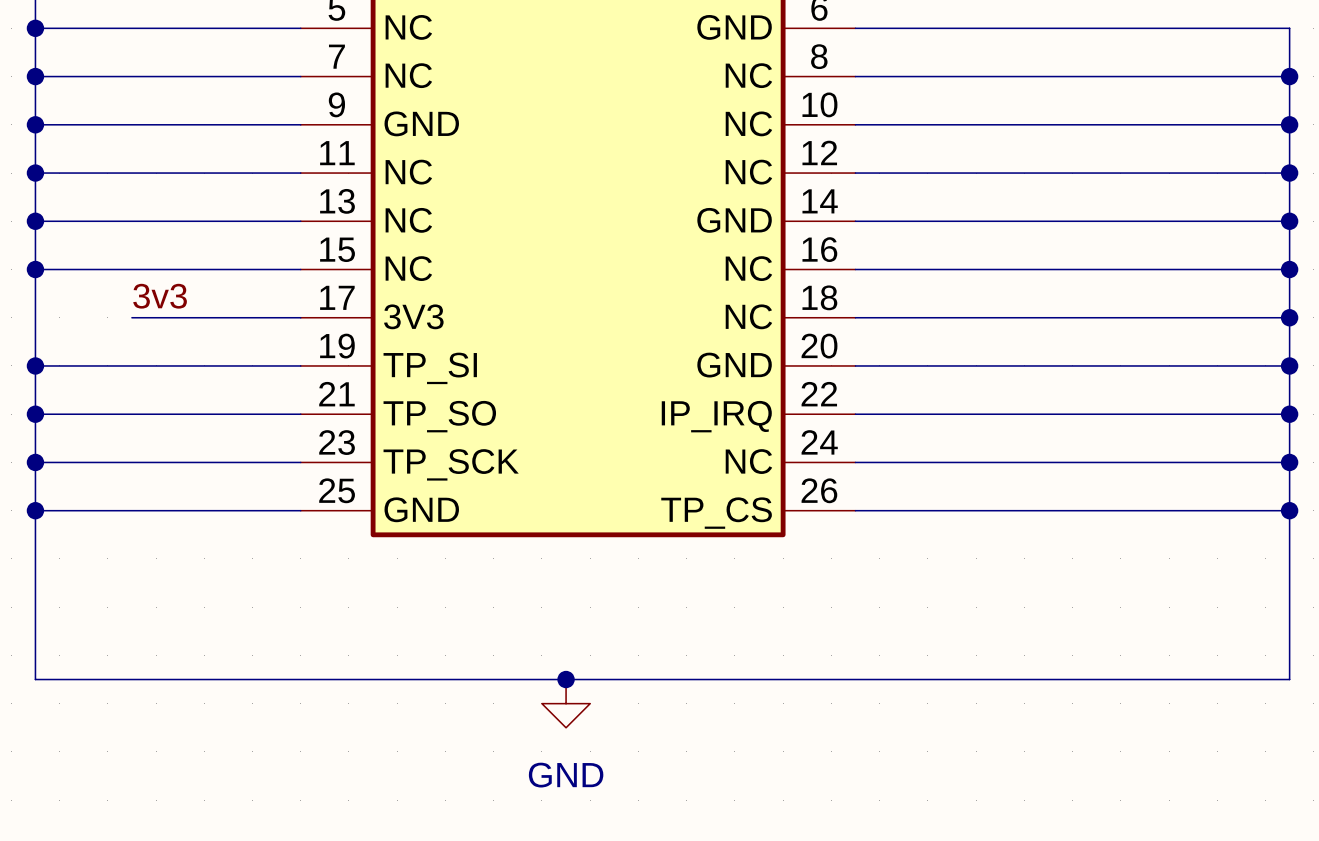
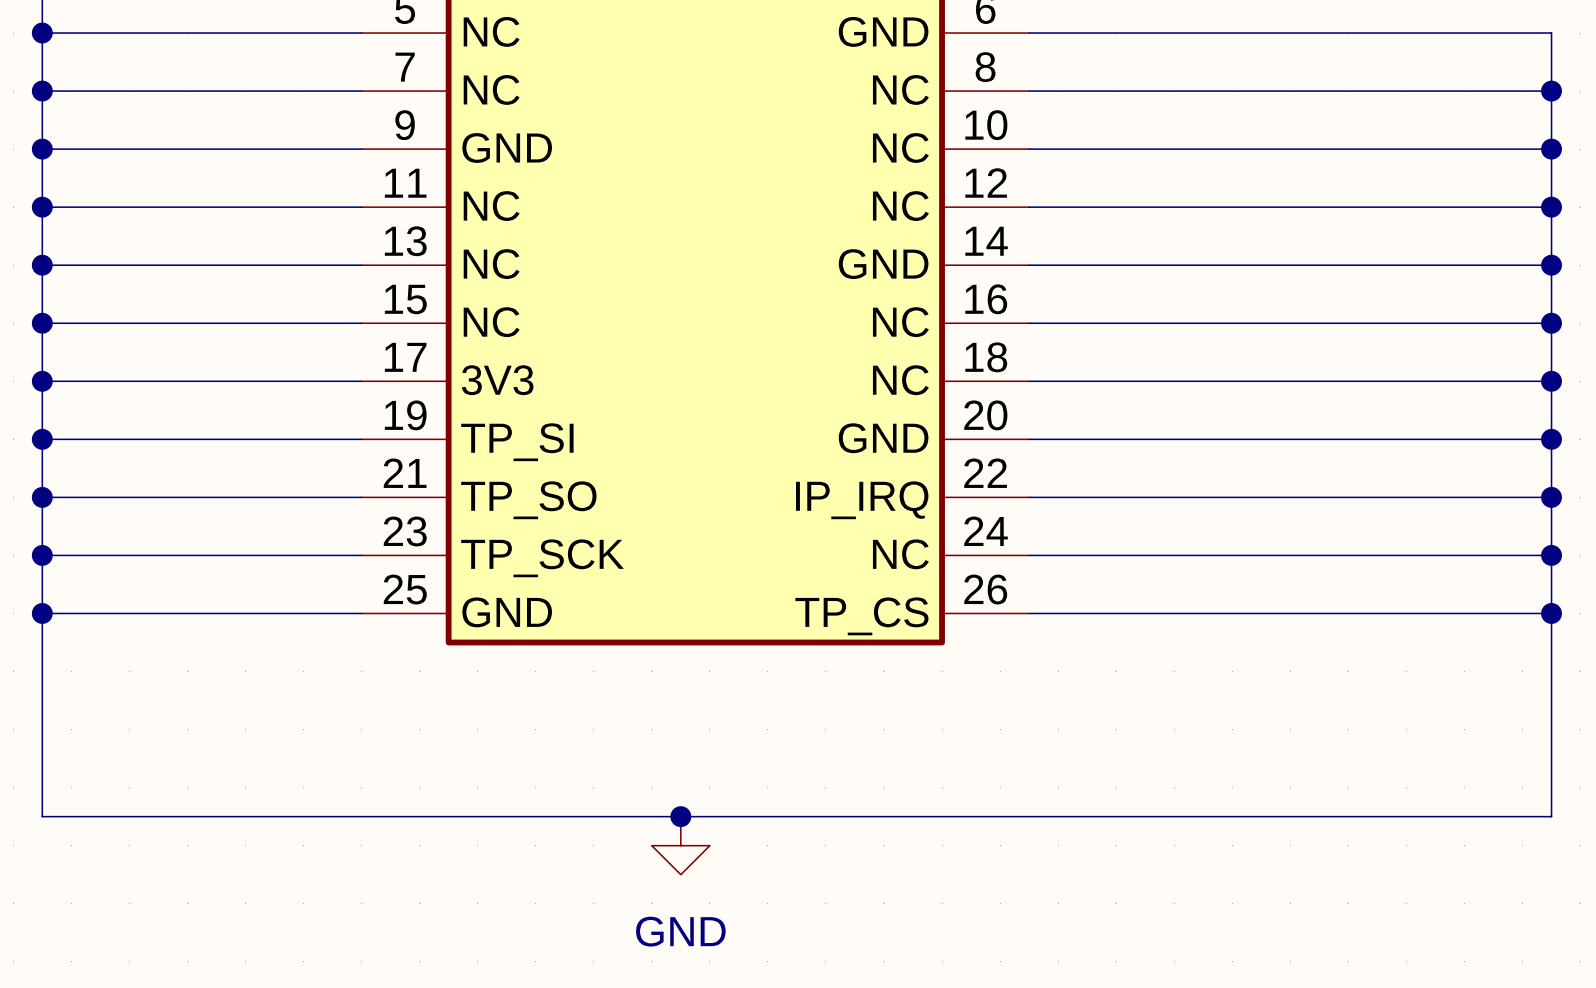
label: 3v3 (160, 296) -> none
wire: none -> (42, 381) (158, 381)
junction: none -> (42, 381)

